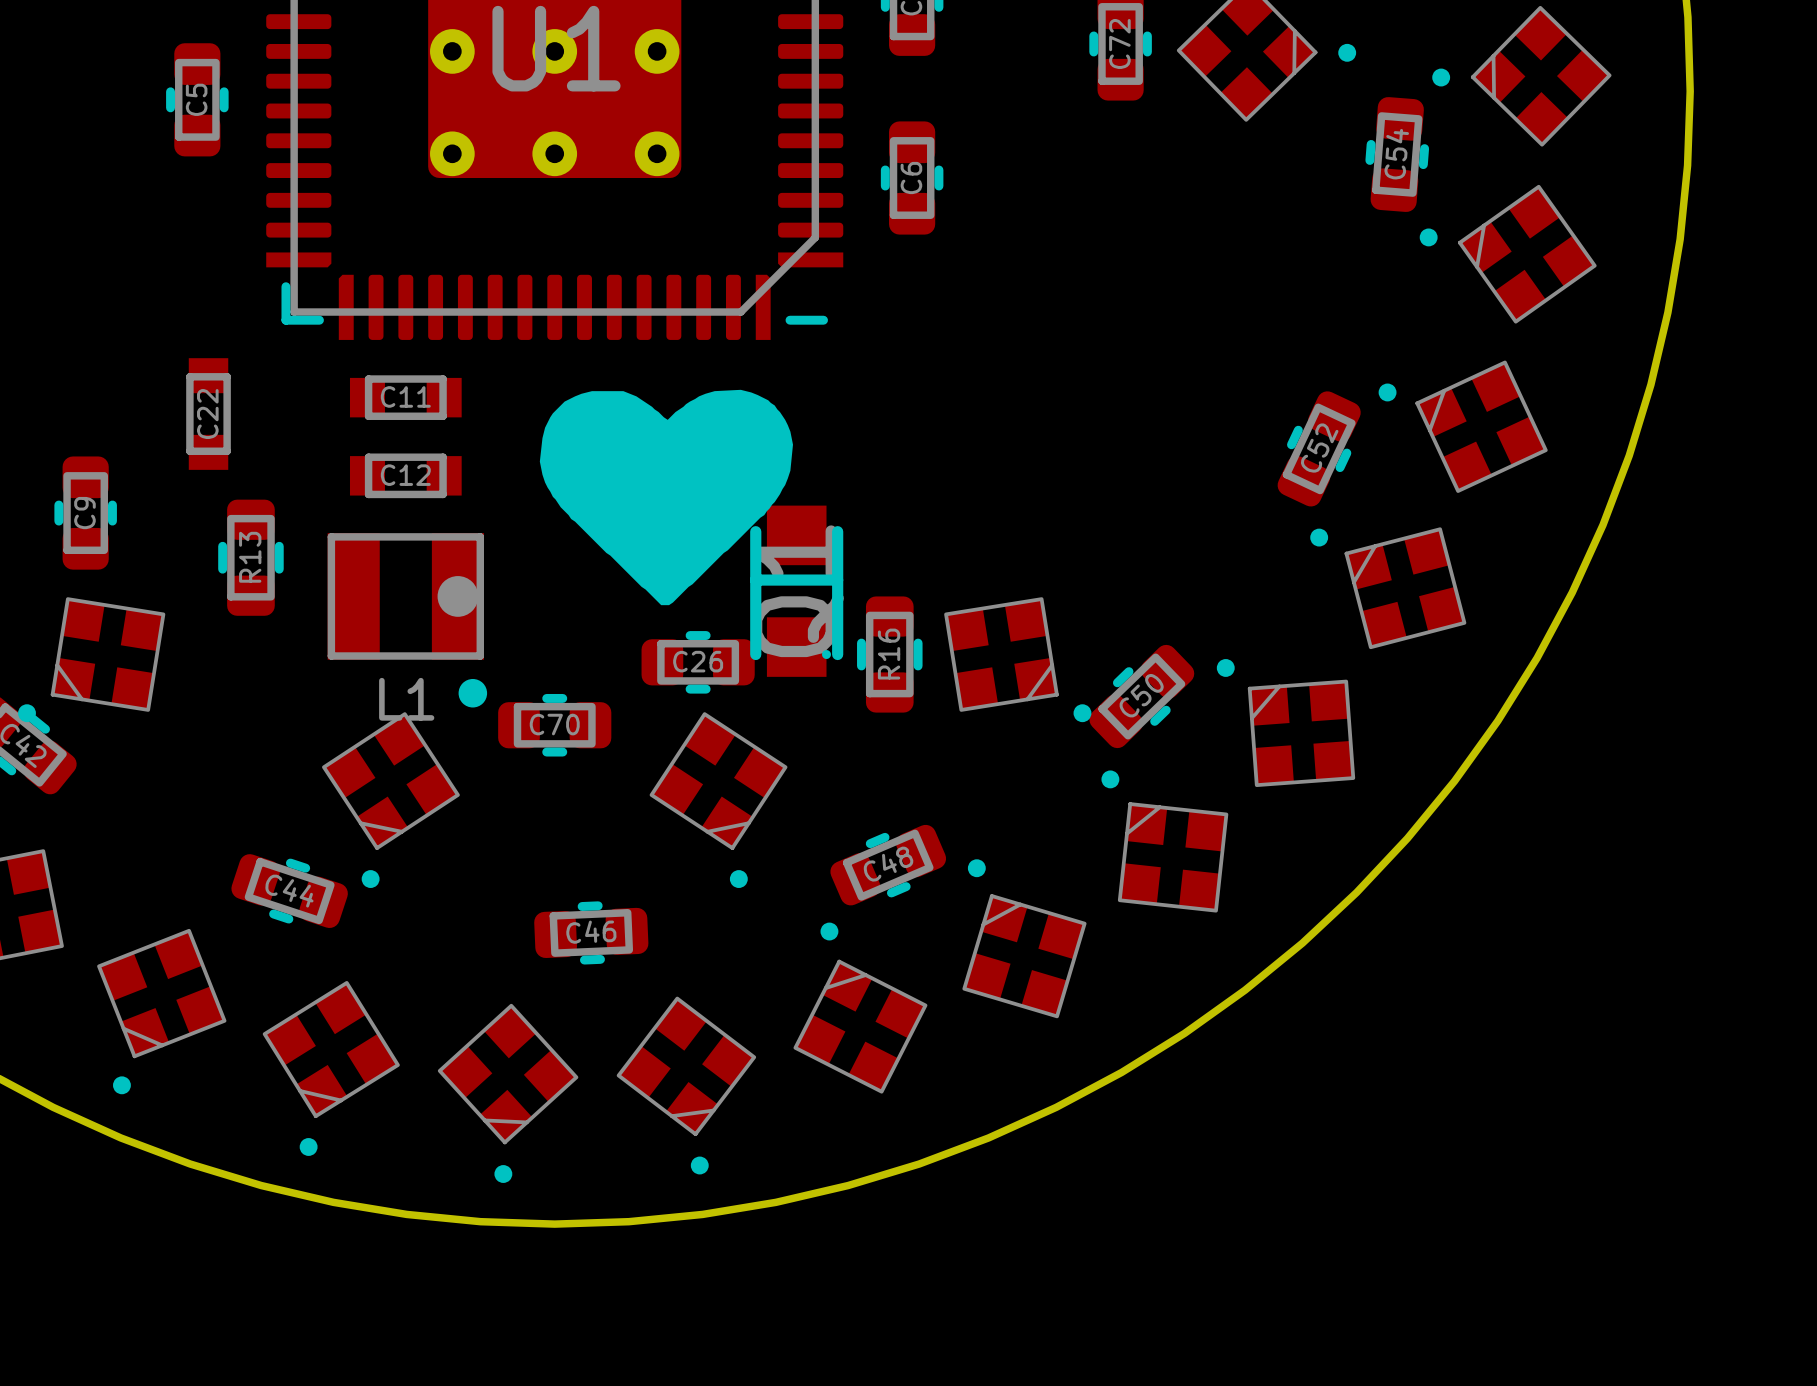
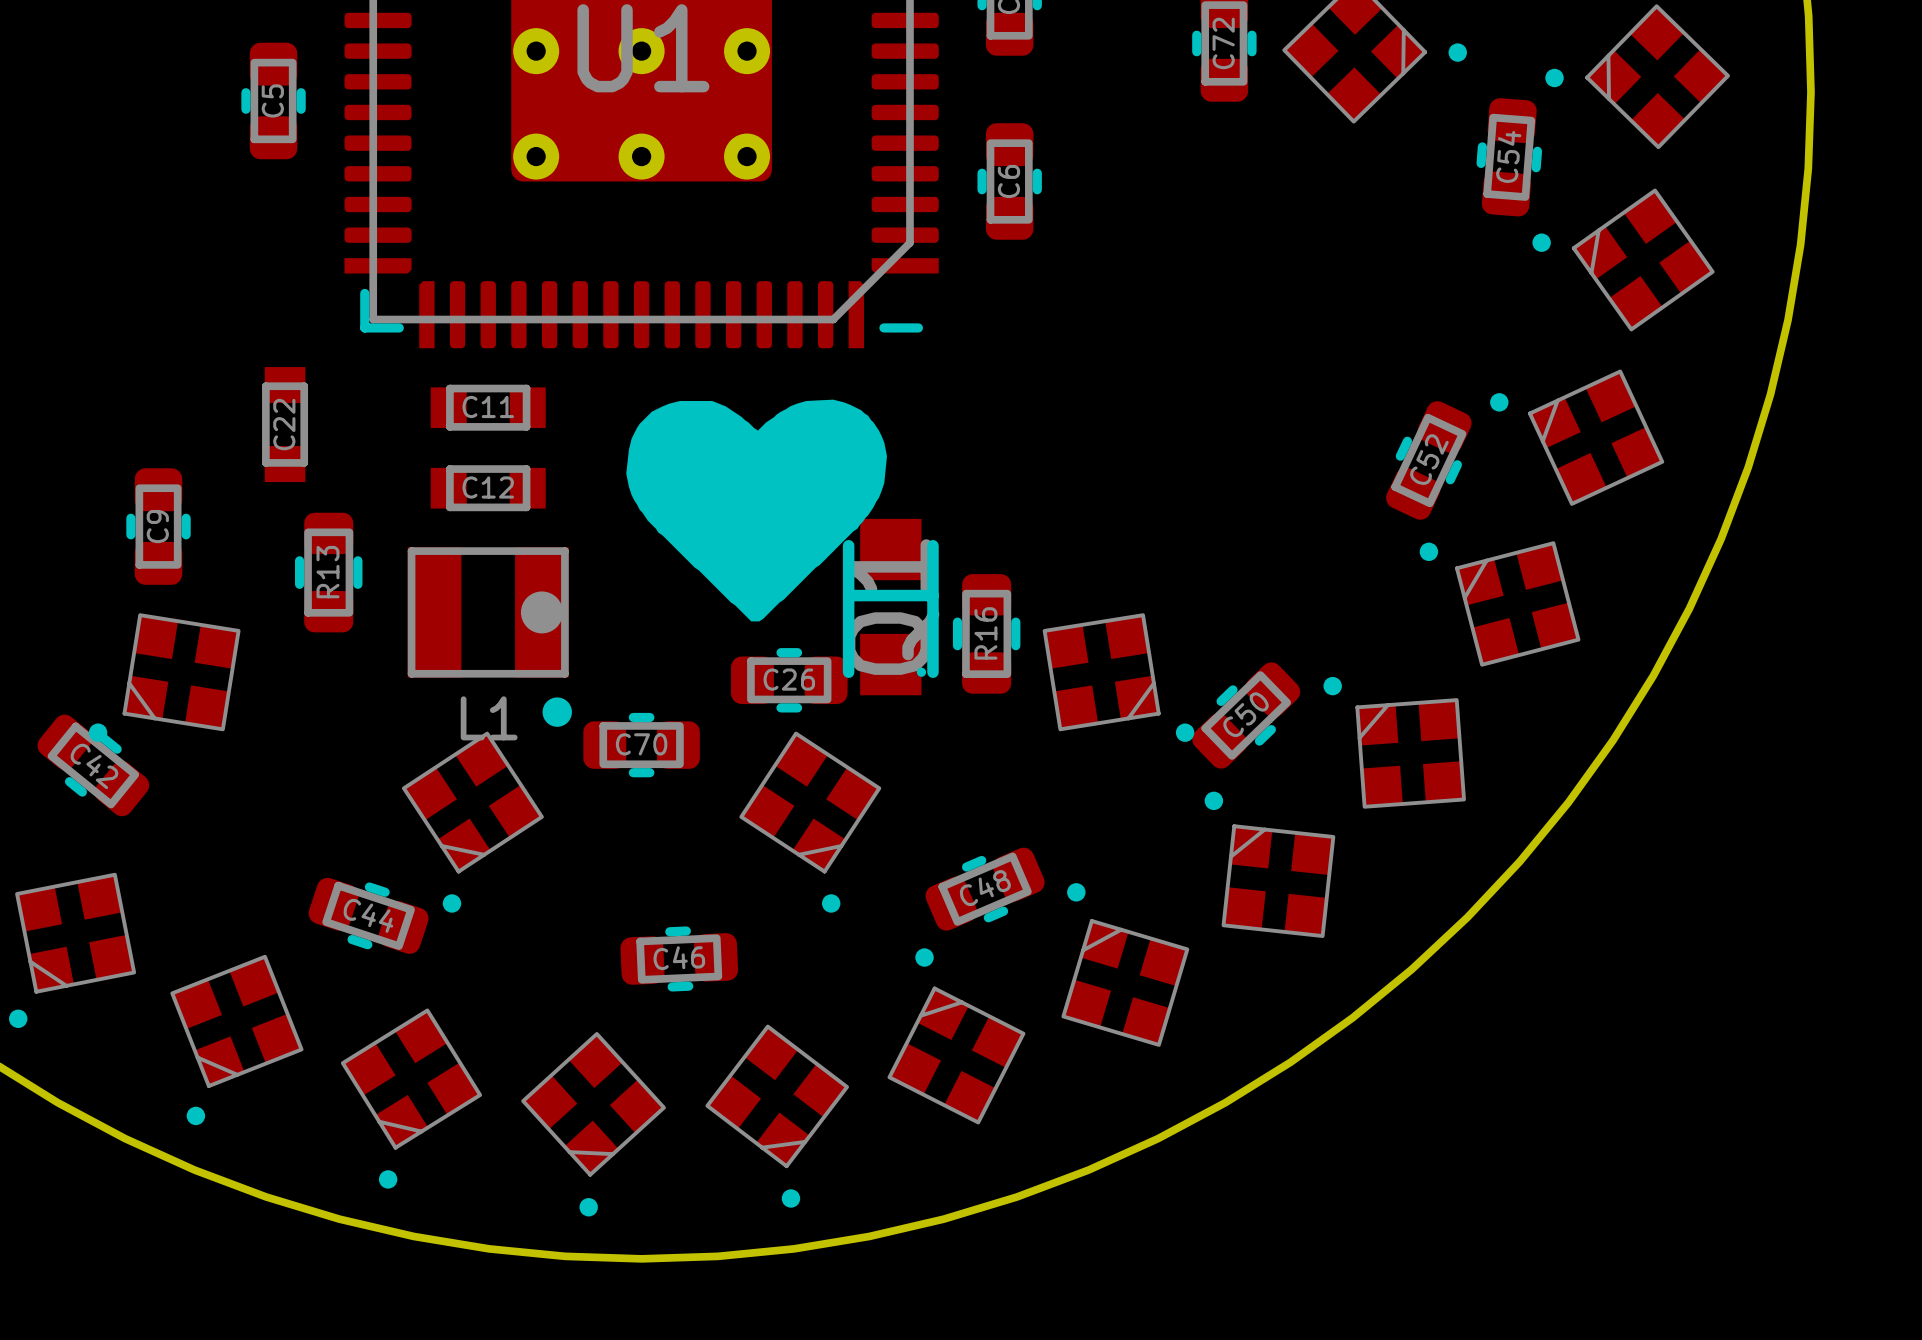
R16 position: (889, 654) -> (986, 633)

